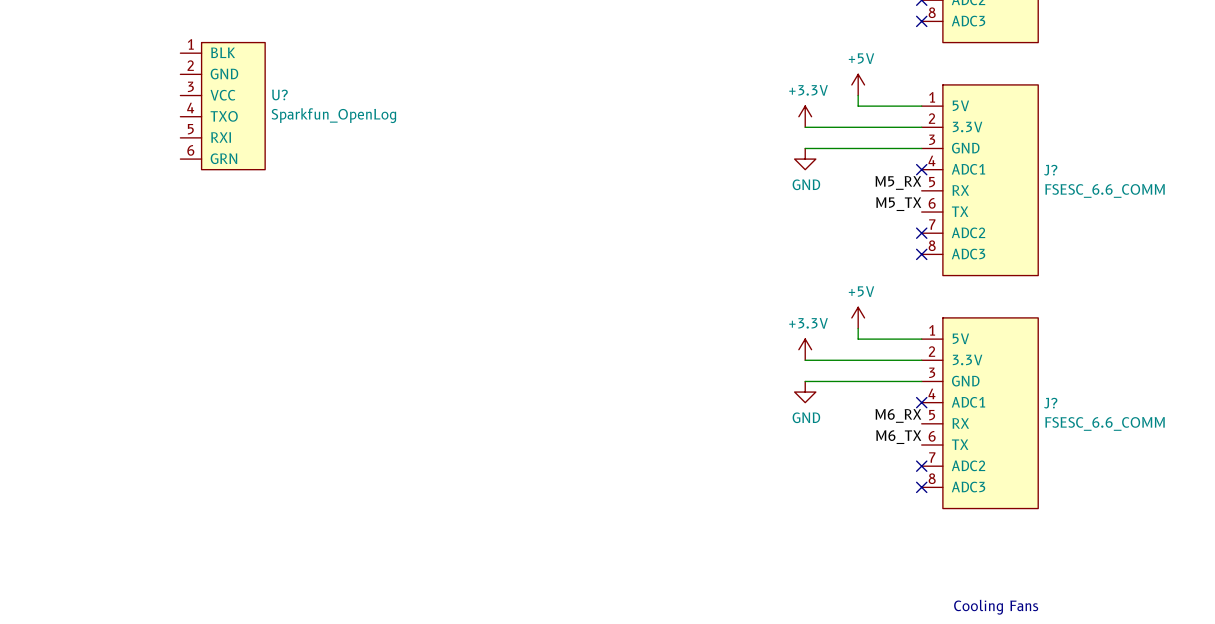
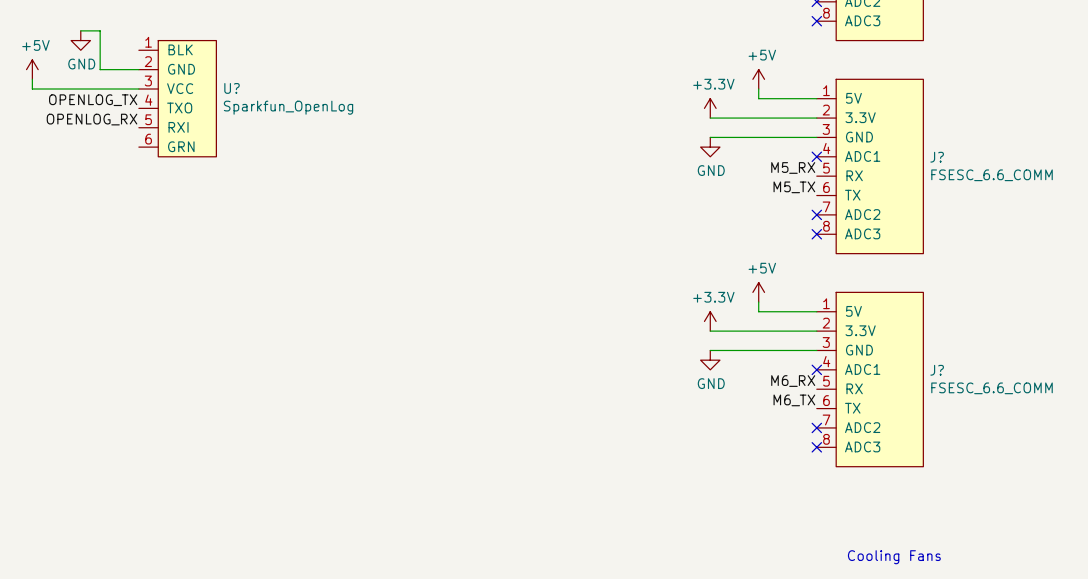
wire: none -> (80, 30) (100, 30) (100, 69) (138, 69)
power symbol: none -> GND (80, 40)
power symbol: none -> +5V (32, 69)
wire: none -> (32, 79) (32, 89) (138, 89)
label: none -> OPENLOG_TX (93, 100)
label: none -> OPENLOG_RX (92, 119)

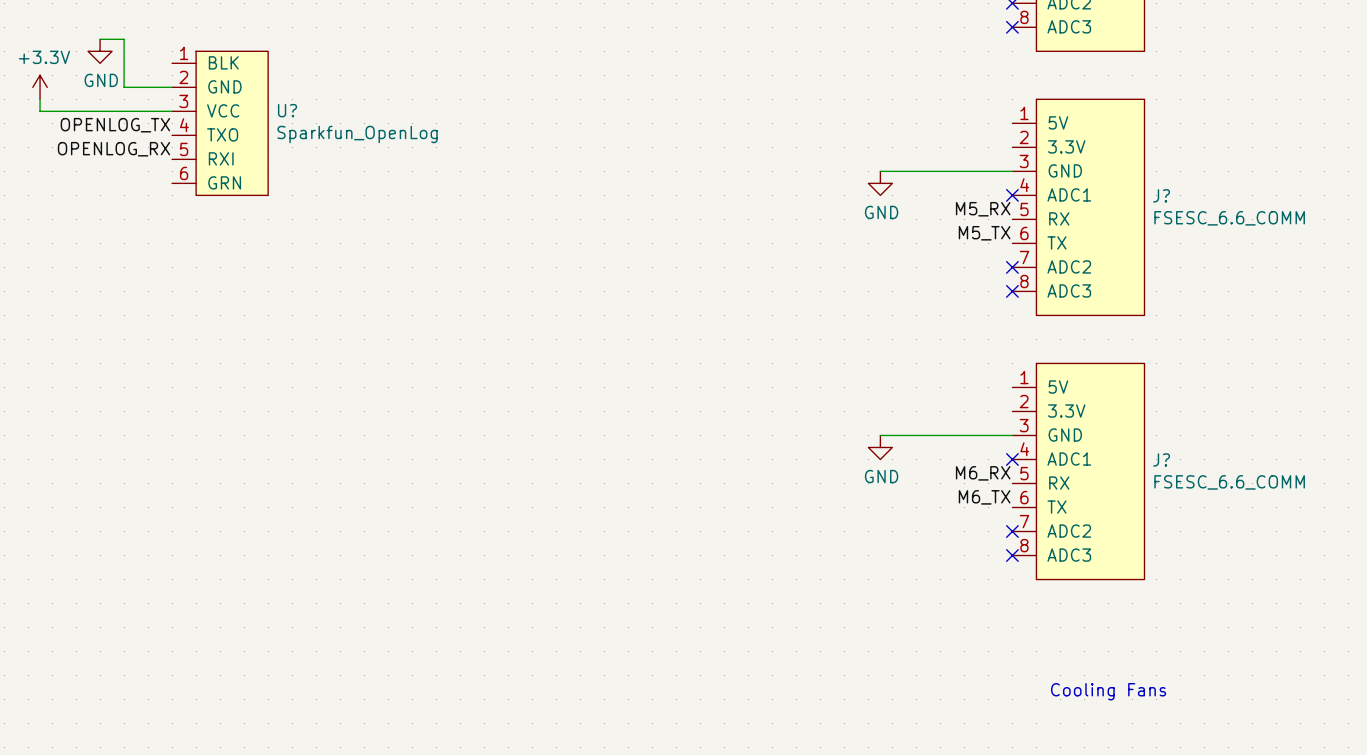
power symbol: +5V (32, 69) -> +3.3V (40, 87)
power symbol: +5V (758, 79) -> none
wire: (758, 89) (758, 98) (816, 98) -> none
power symbol: +3.3V (710, 108) -> none
wire: (710, 118) (816, 118) -> none
power symbol: +5V (758, 292) -> none
wire: (758, 302) (758, 311) (816, 311) -> none
power symbol: +3.3V (710, 321) -> none
wire: (710, 331) (816, 331) -> none

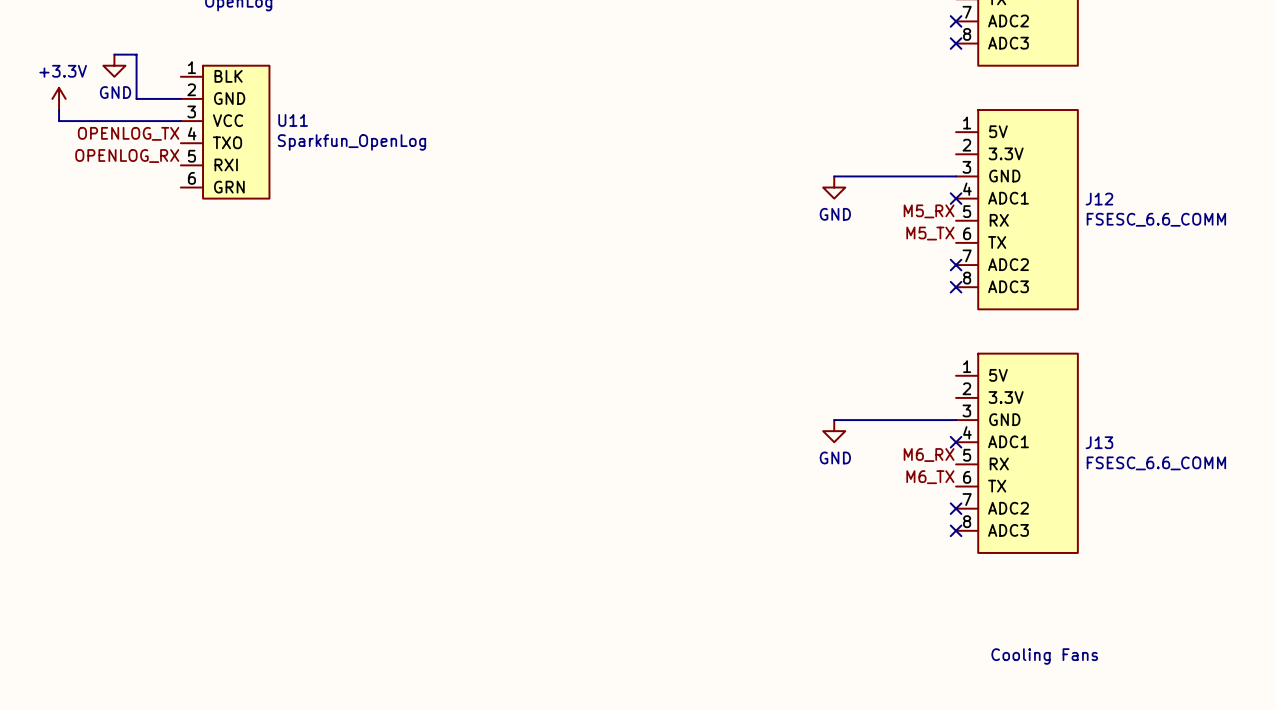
U? name: U? (287, 110) -> U11 (293, 120)
J? name: J? (1161, 195) -> J12 (1099, 199)
J? name: J? (1161, 459) -> J13 (1099, 442)

